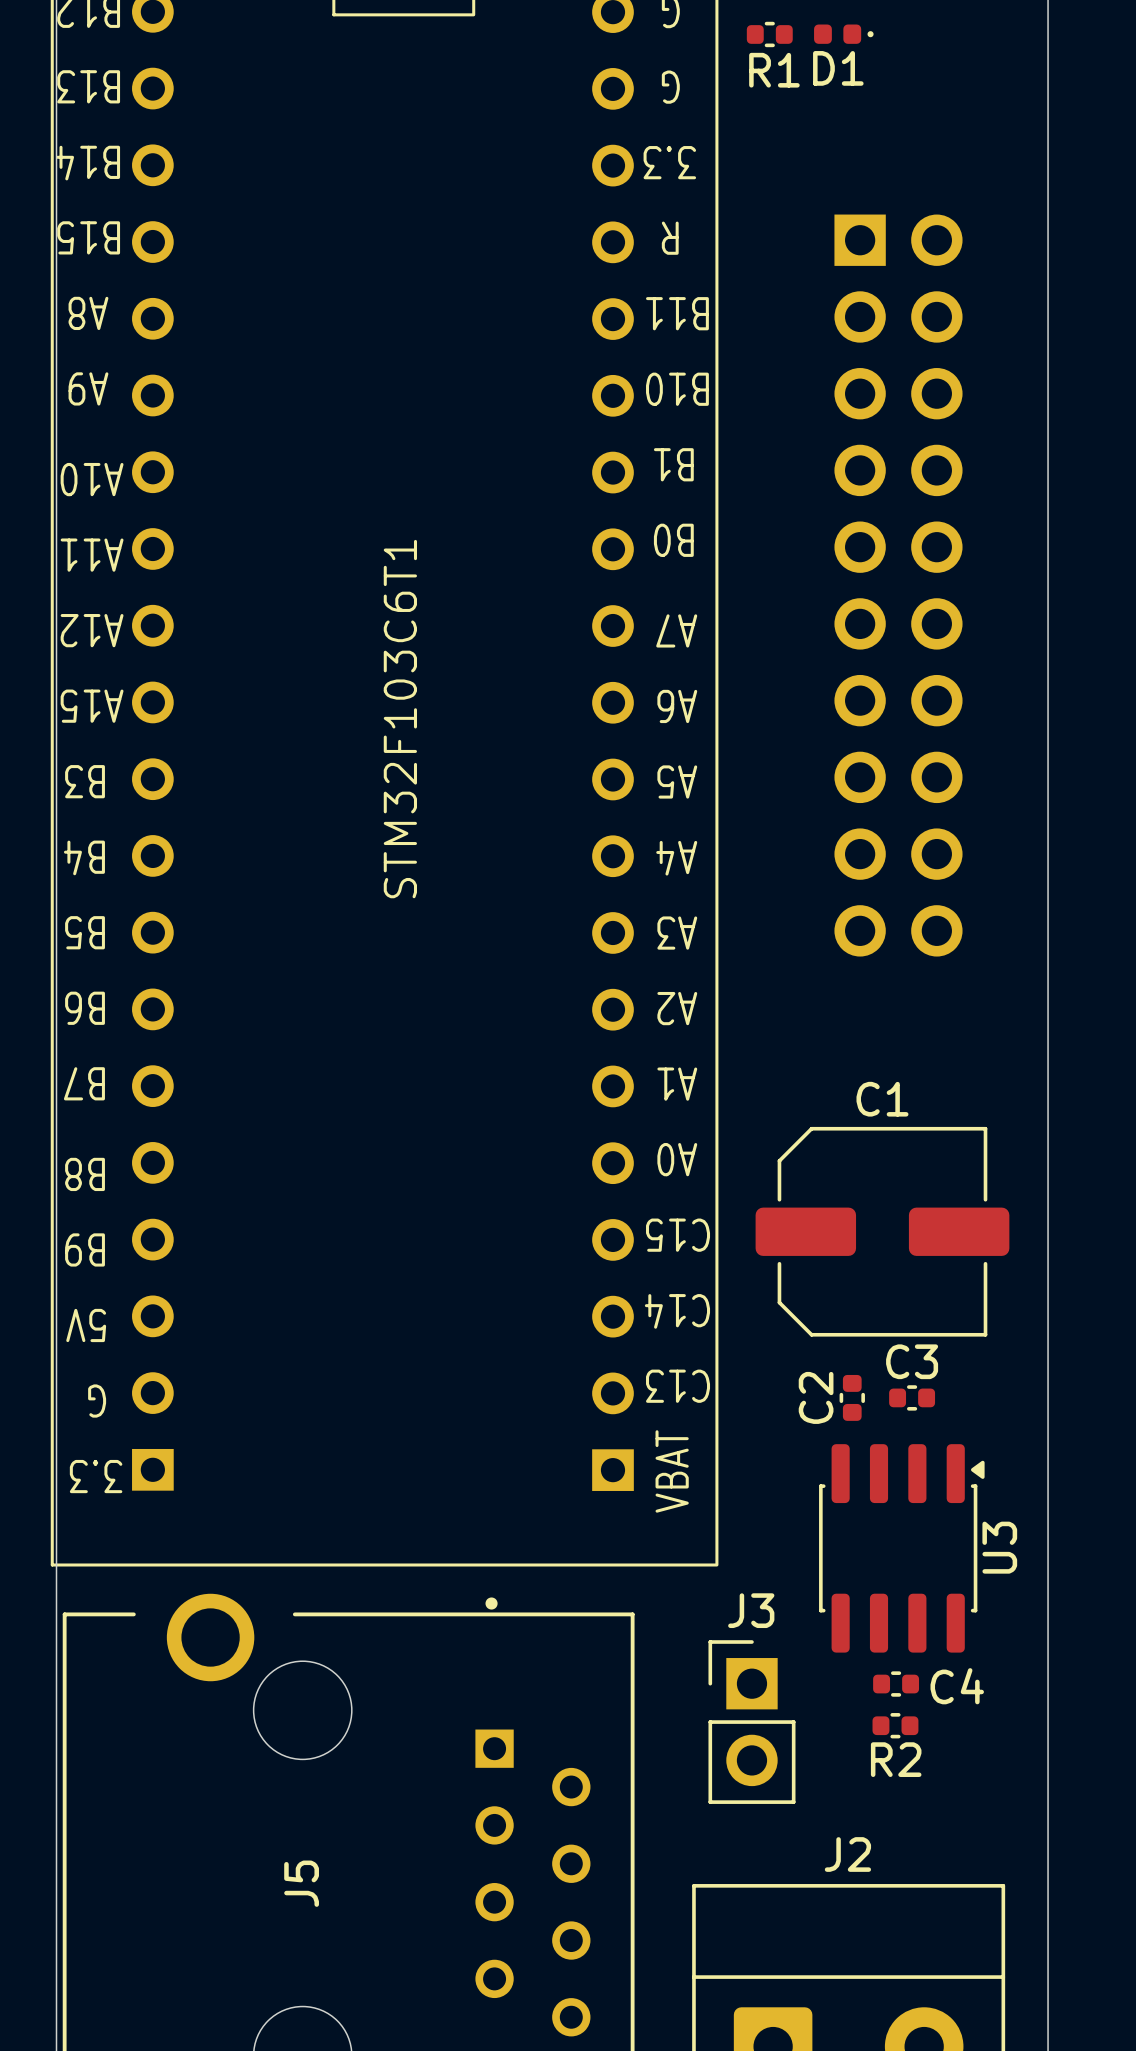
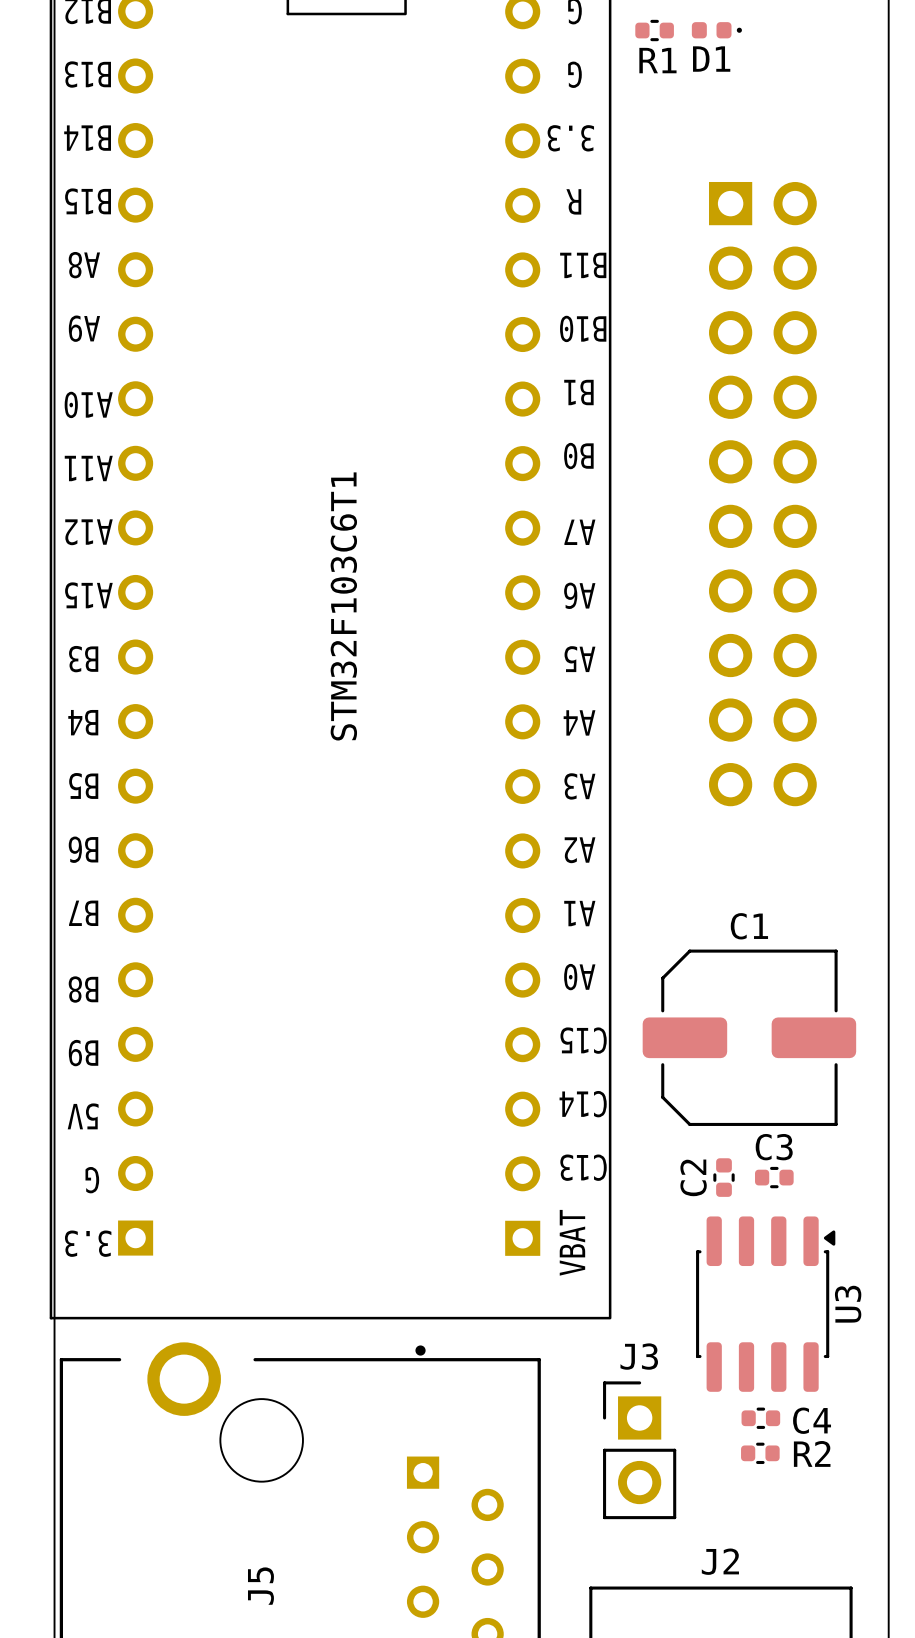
R2 name position: R2 (896, 1759) -> R2 (812, 1453)

